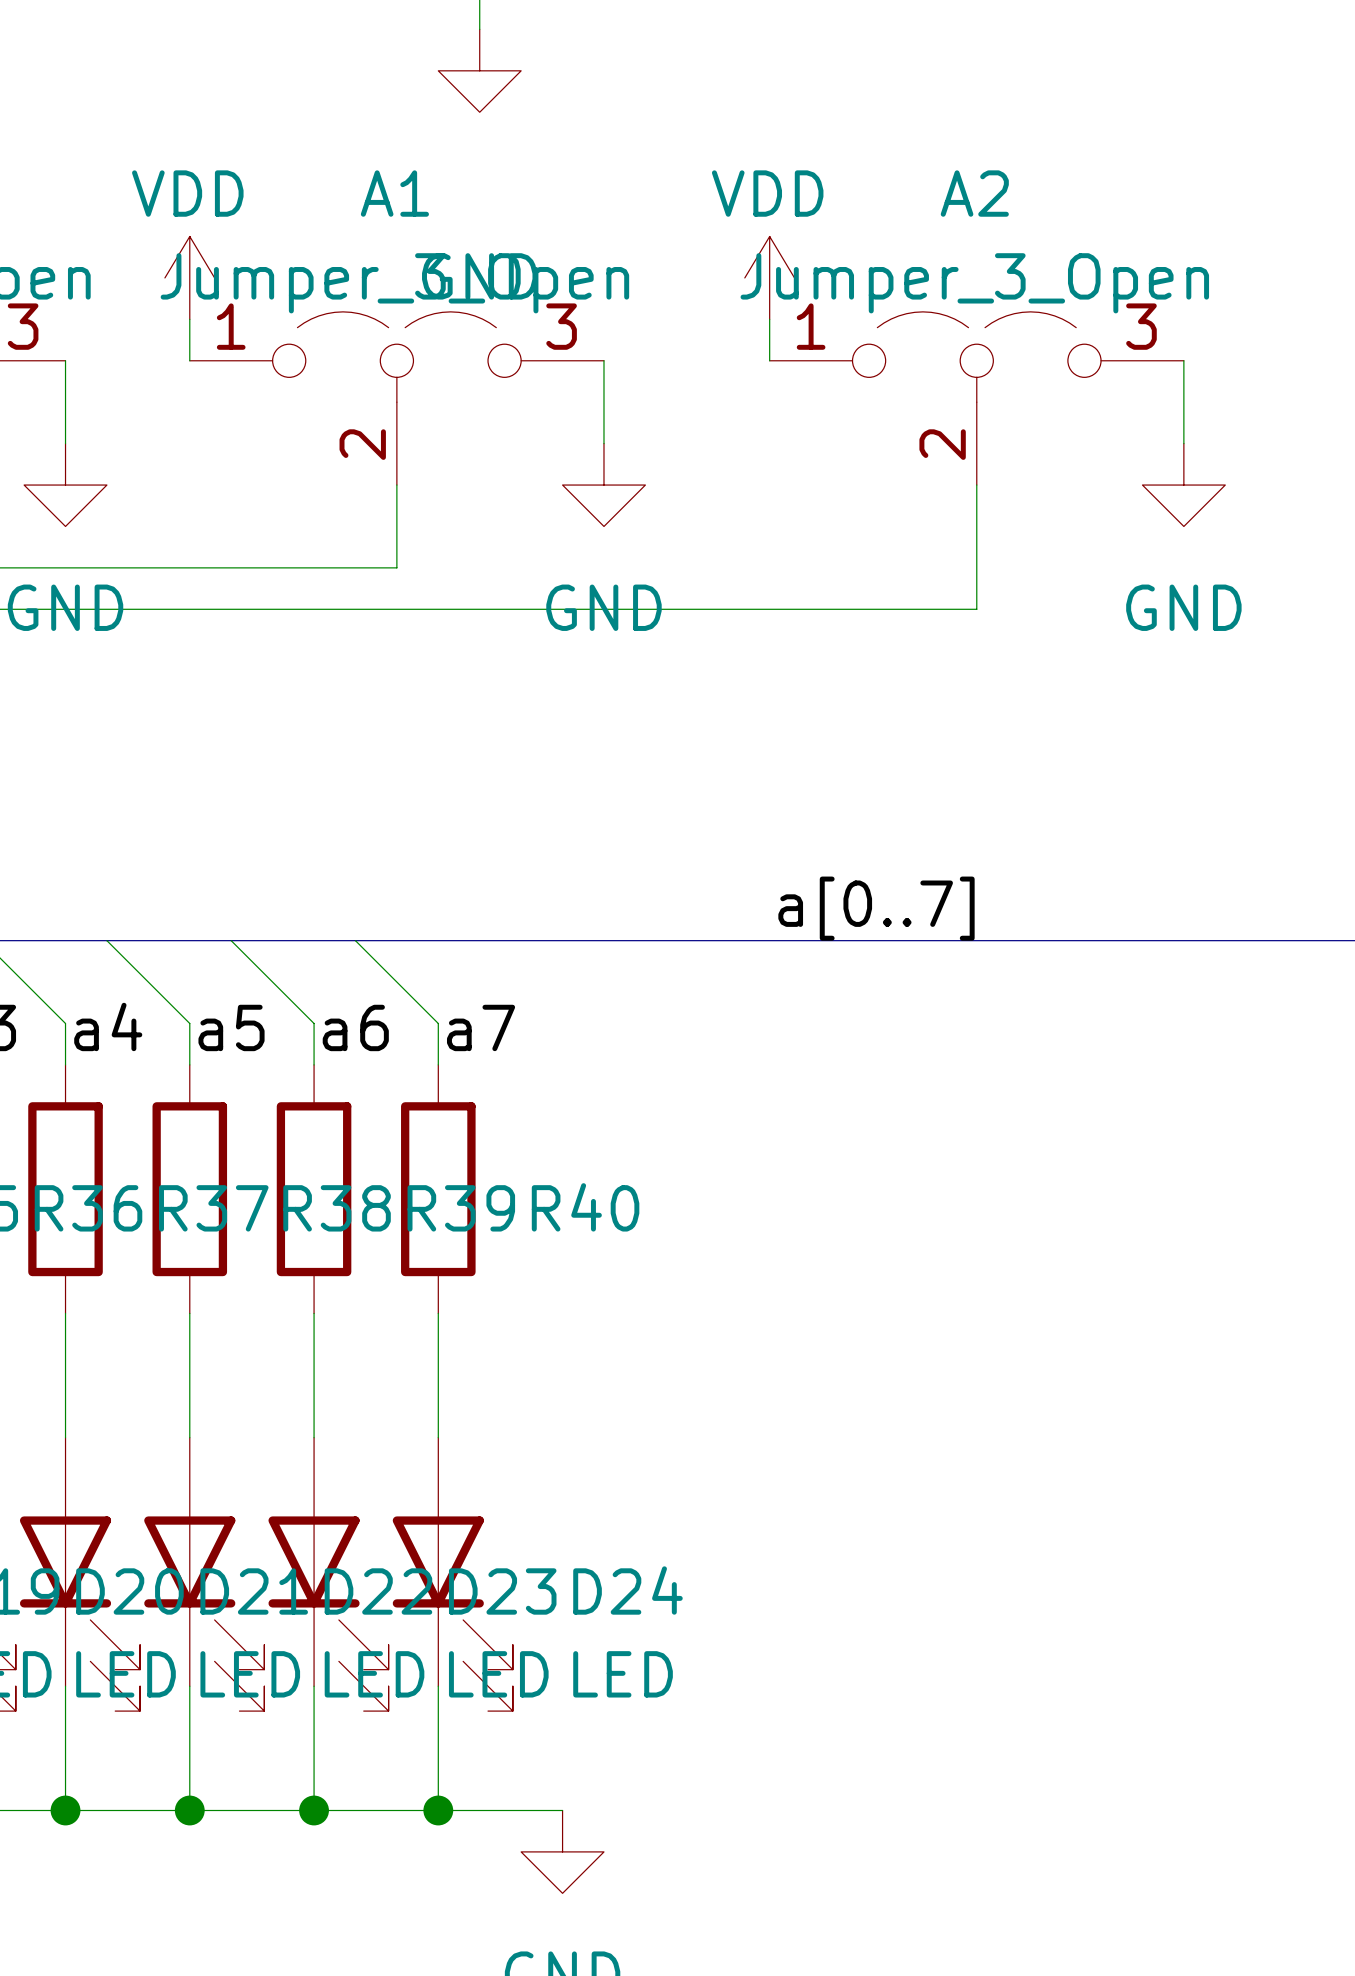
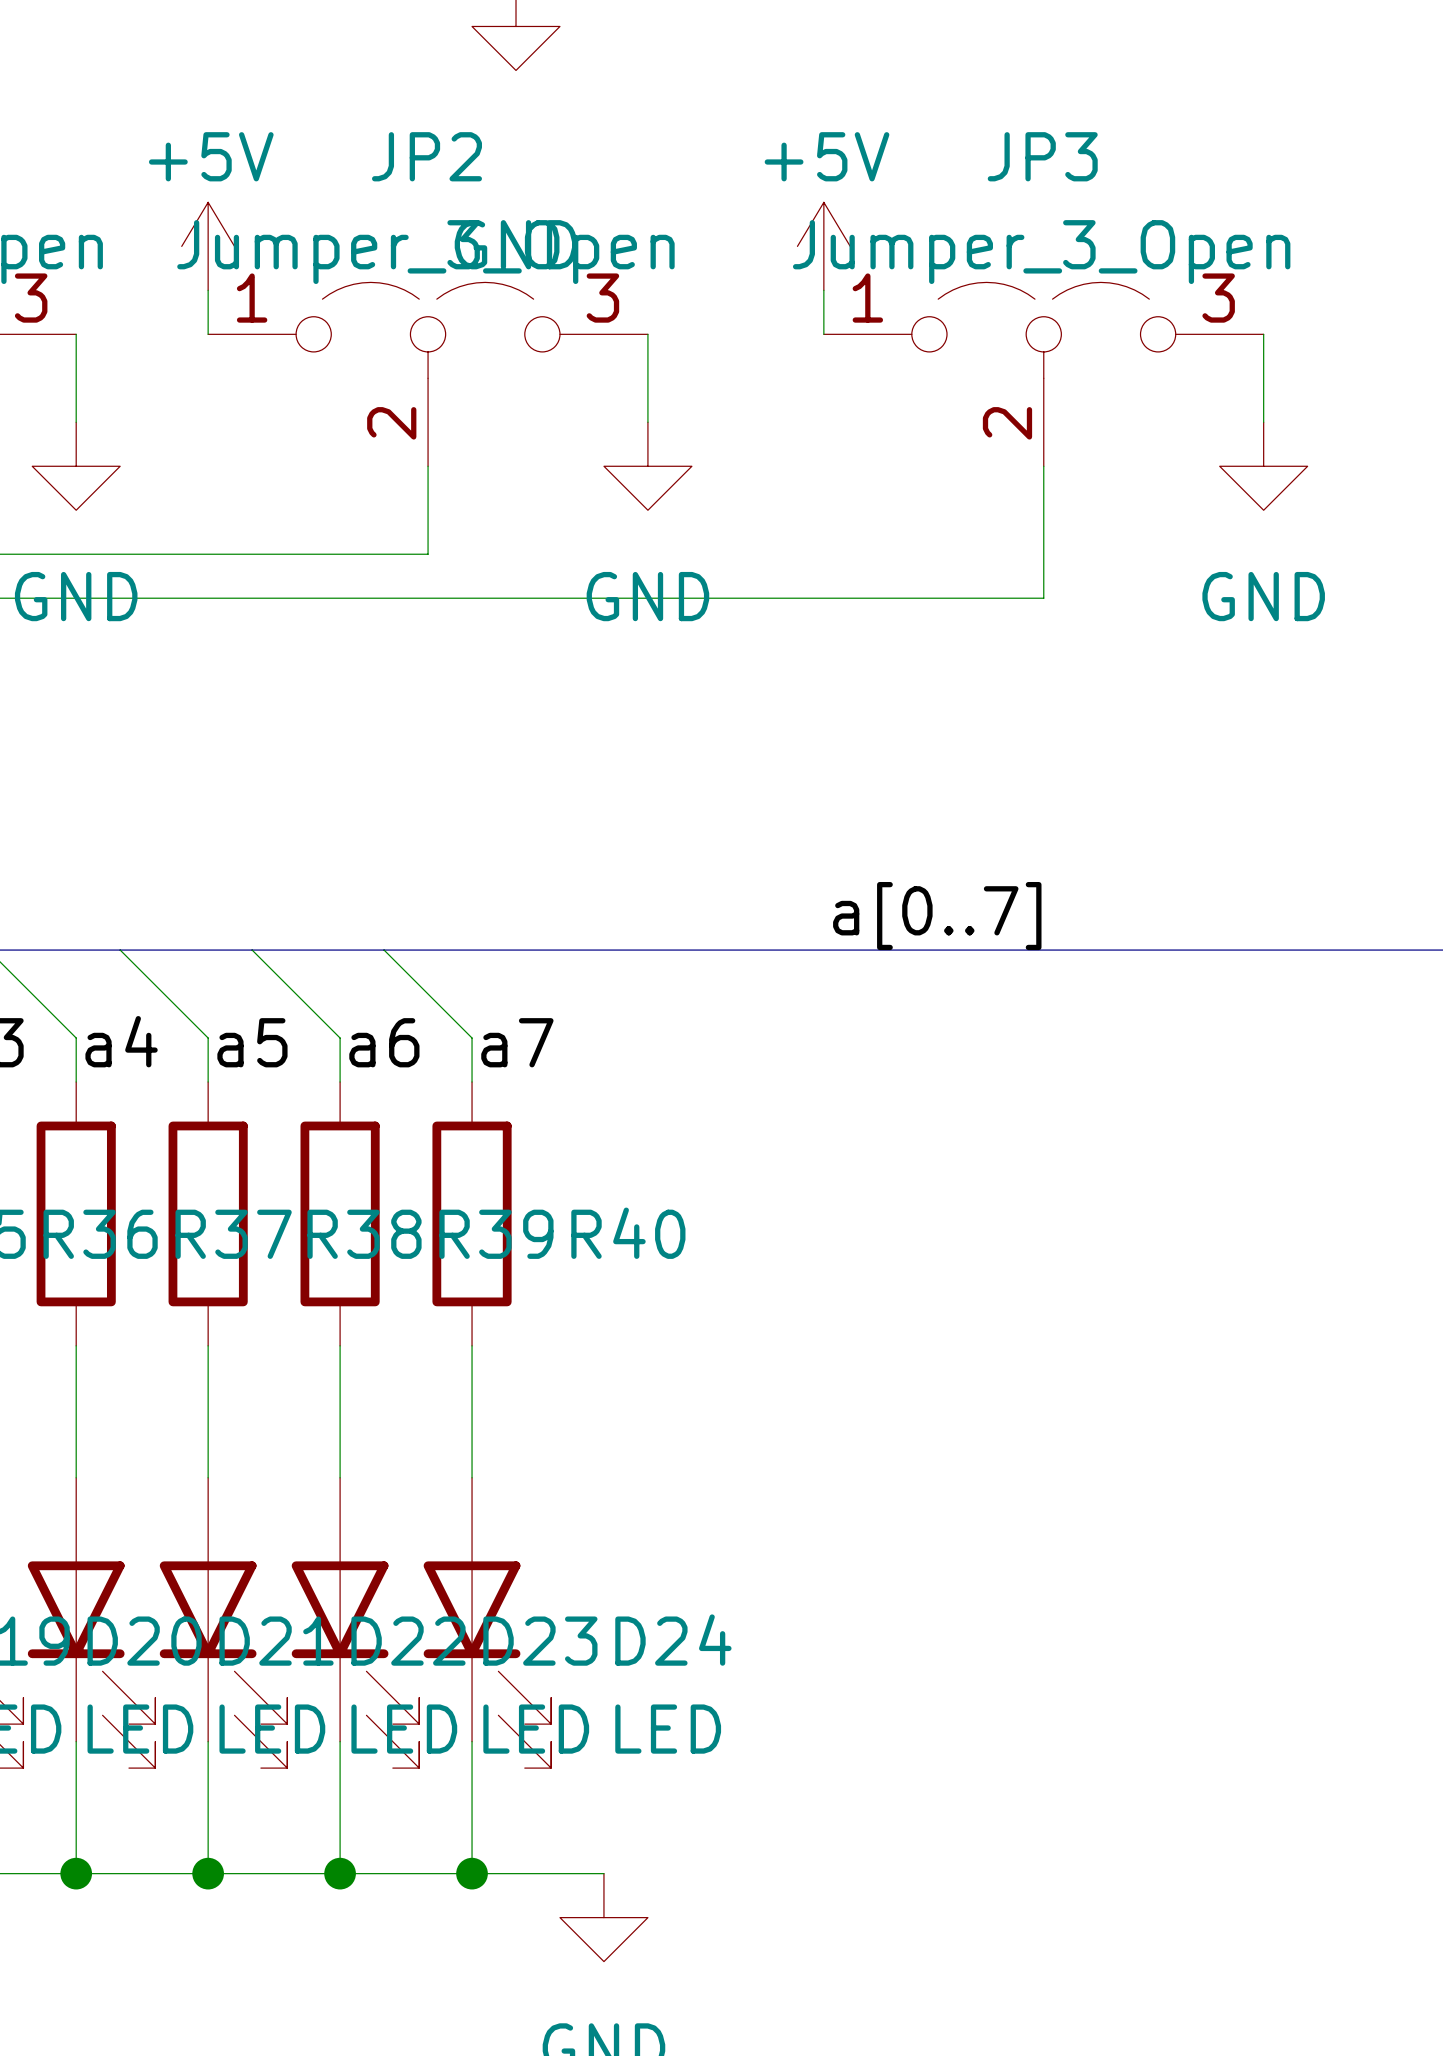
A1 name: A1 (394, 193) -> JP2 (426, 156)
A2 name: A2 (974, 193) -> JP3 (1042, 156)
power symbol: VDD (189, 277) -> +5V (208, 246)
power symbol: VDD (769, 277) -> +5V (823, 246)

